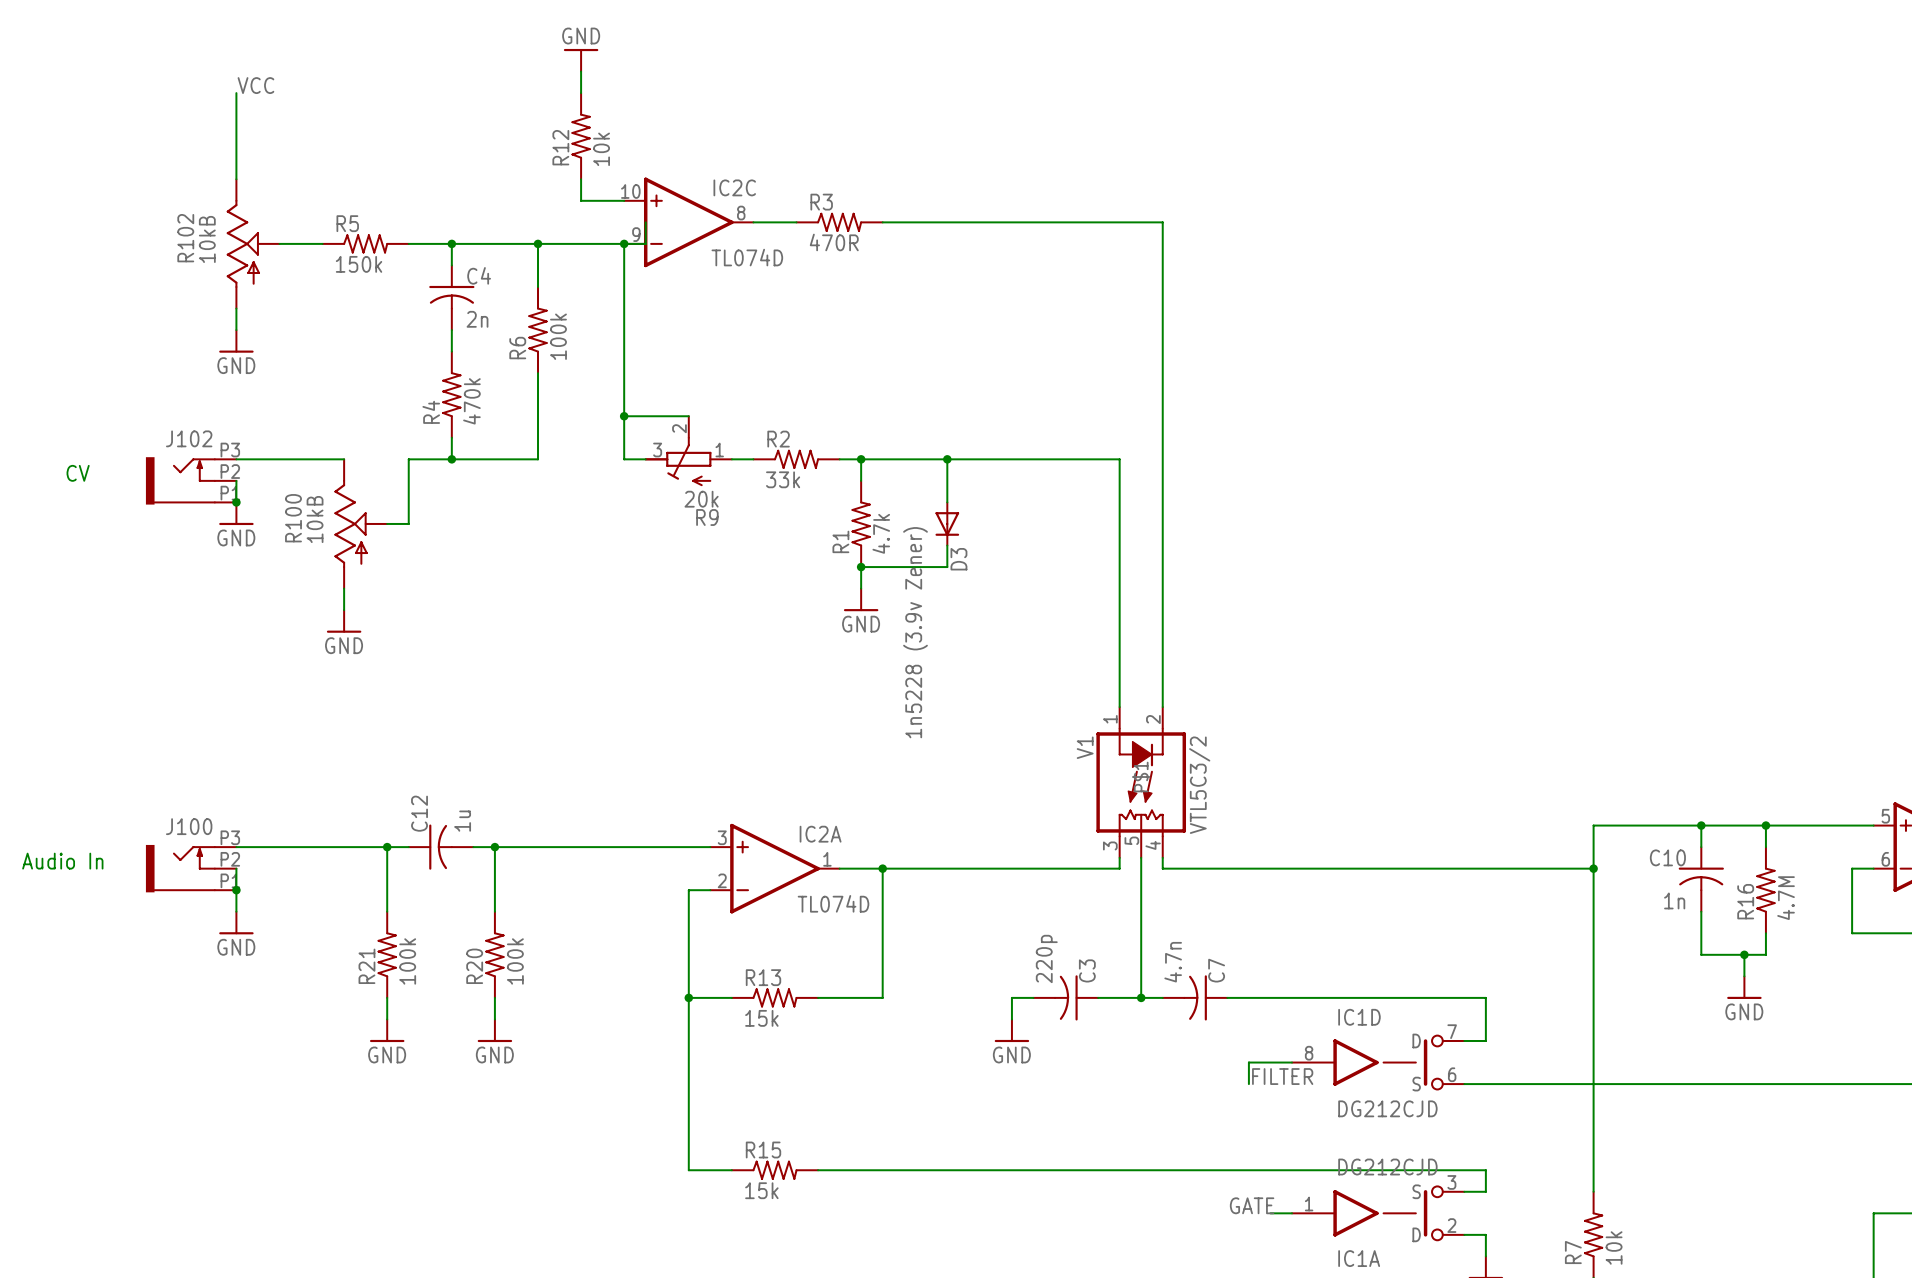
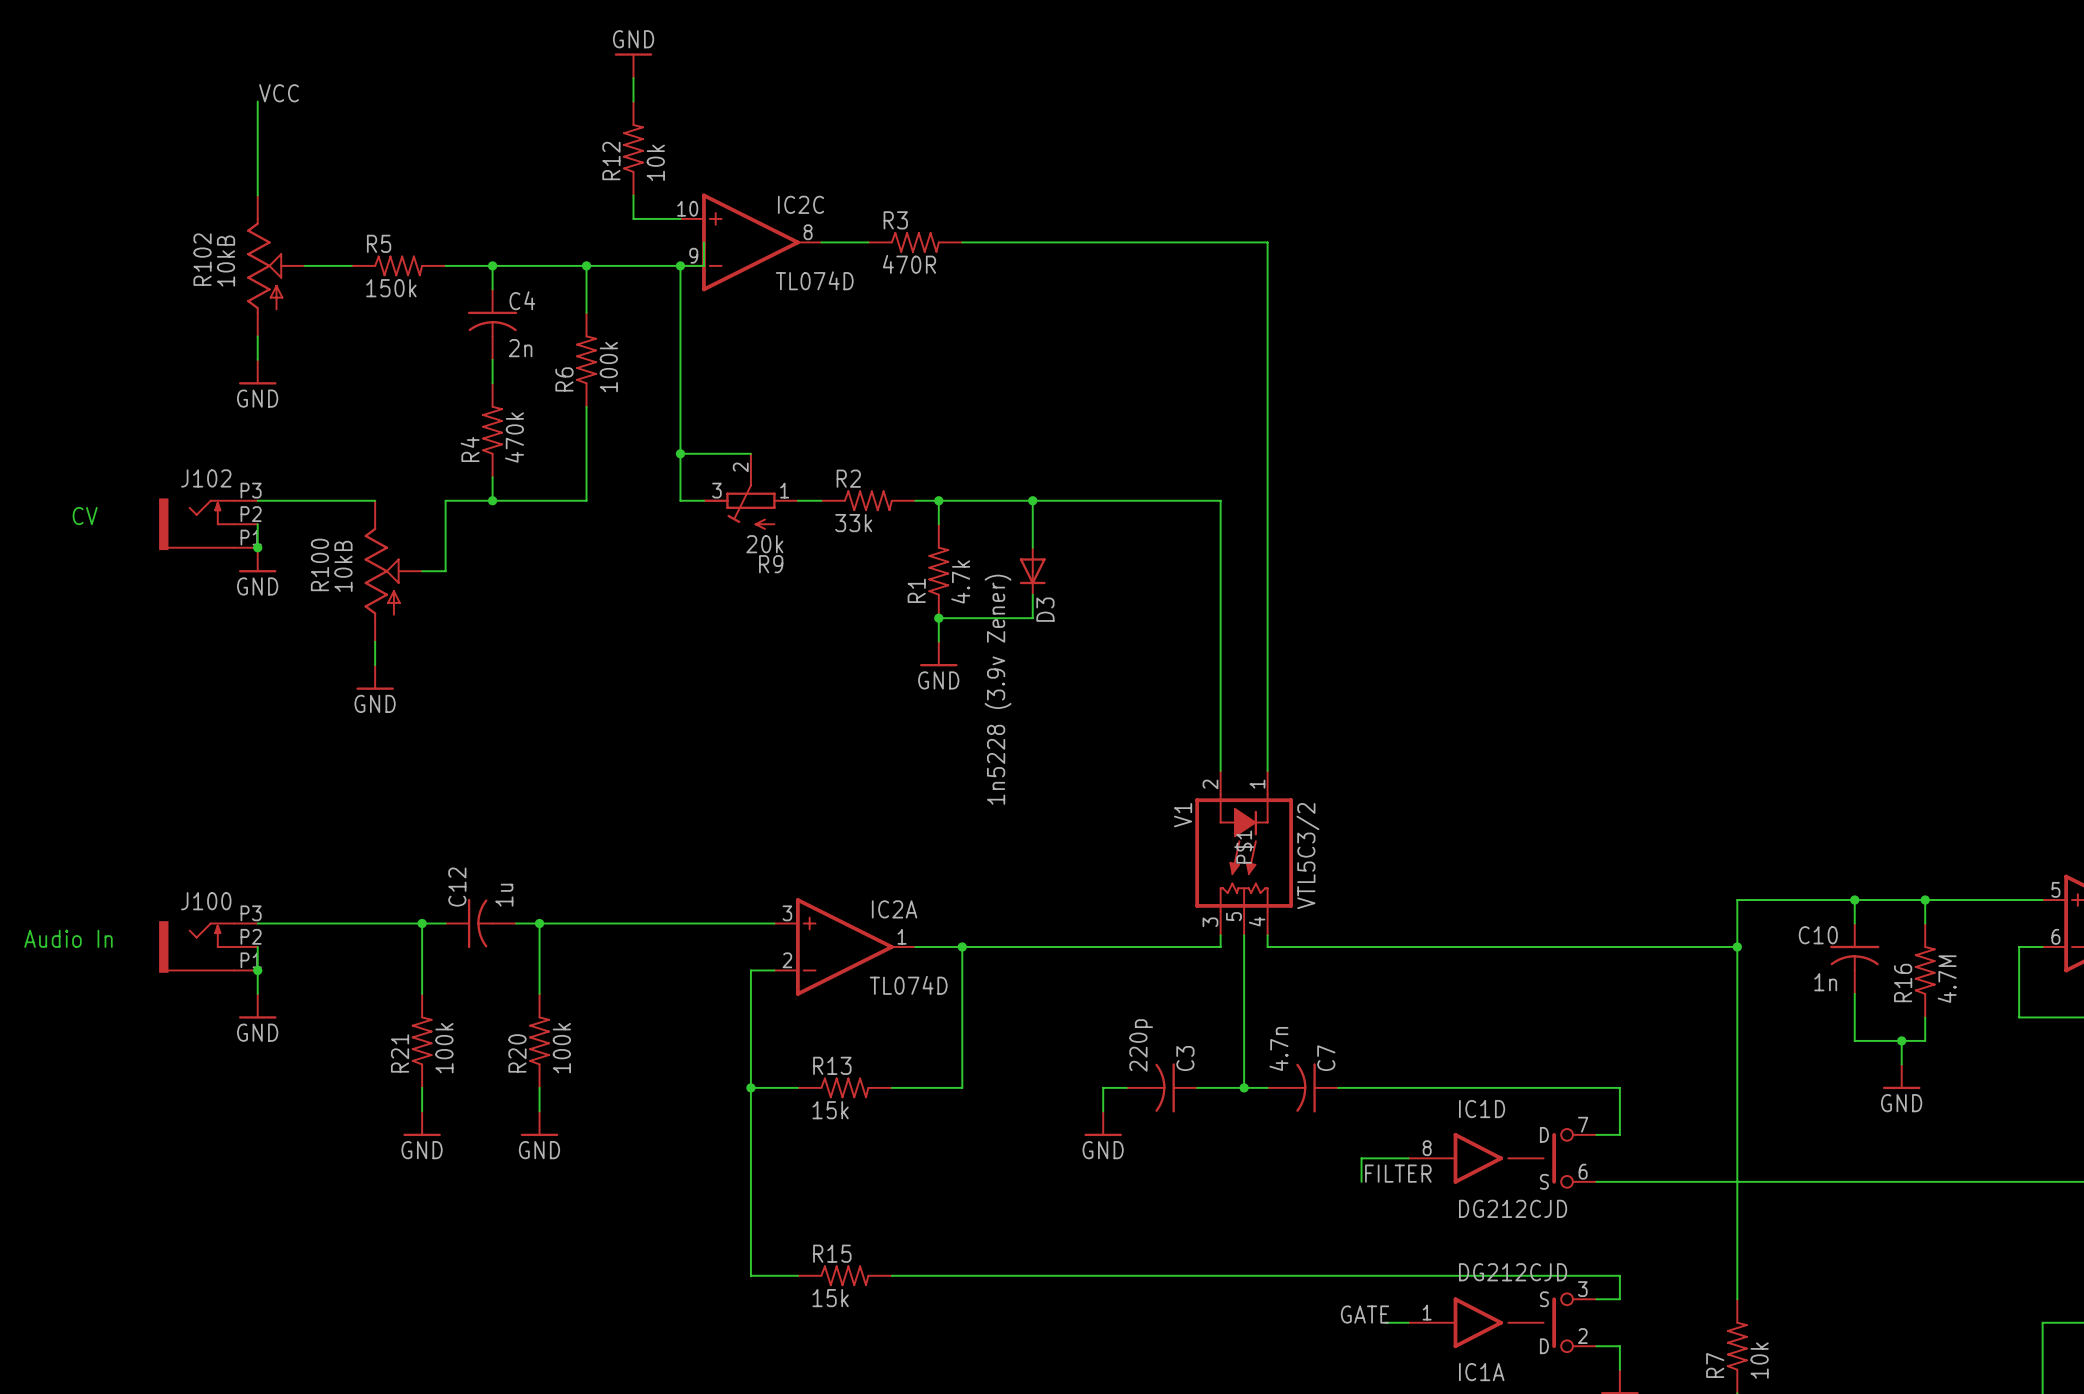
V1 pin number: 1 (1110, 719) -> 2 (1210, 784)
V1 pin number: 2 (1153, 719) -> 1 (1257, 784)

